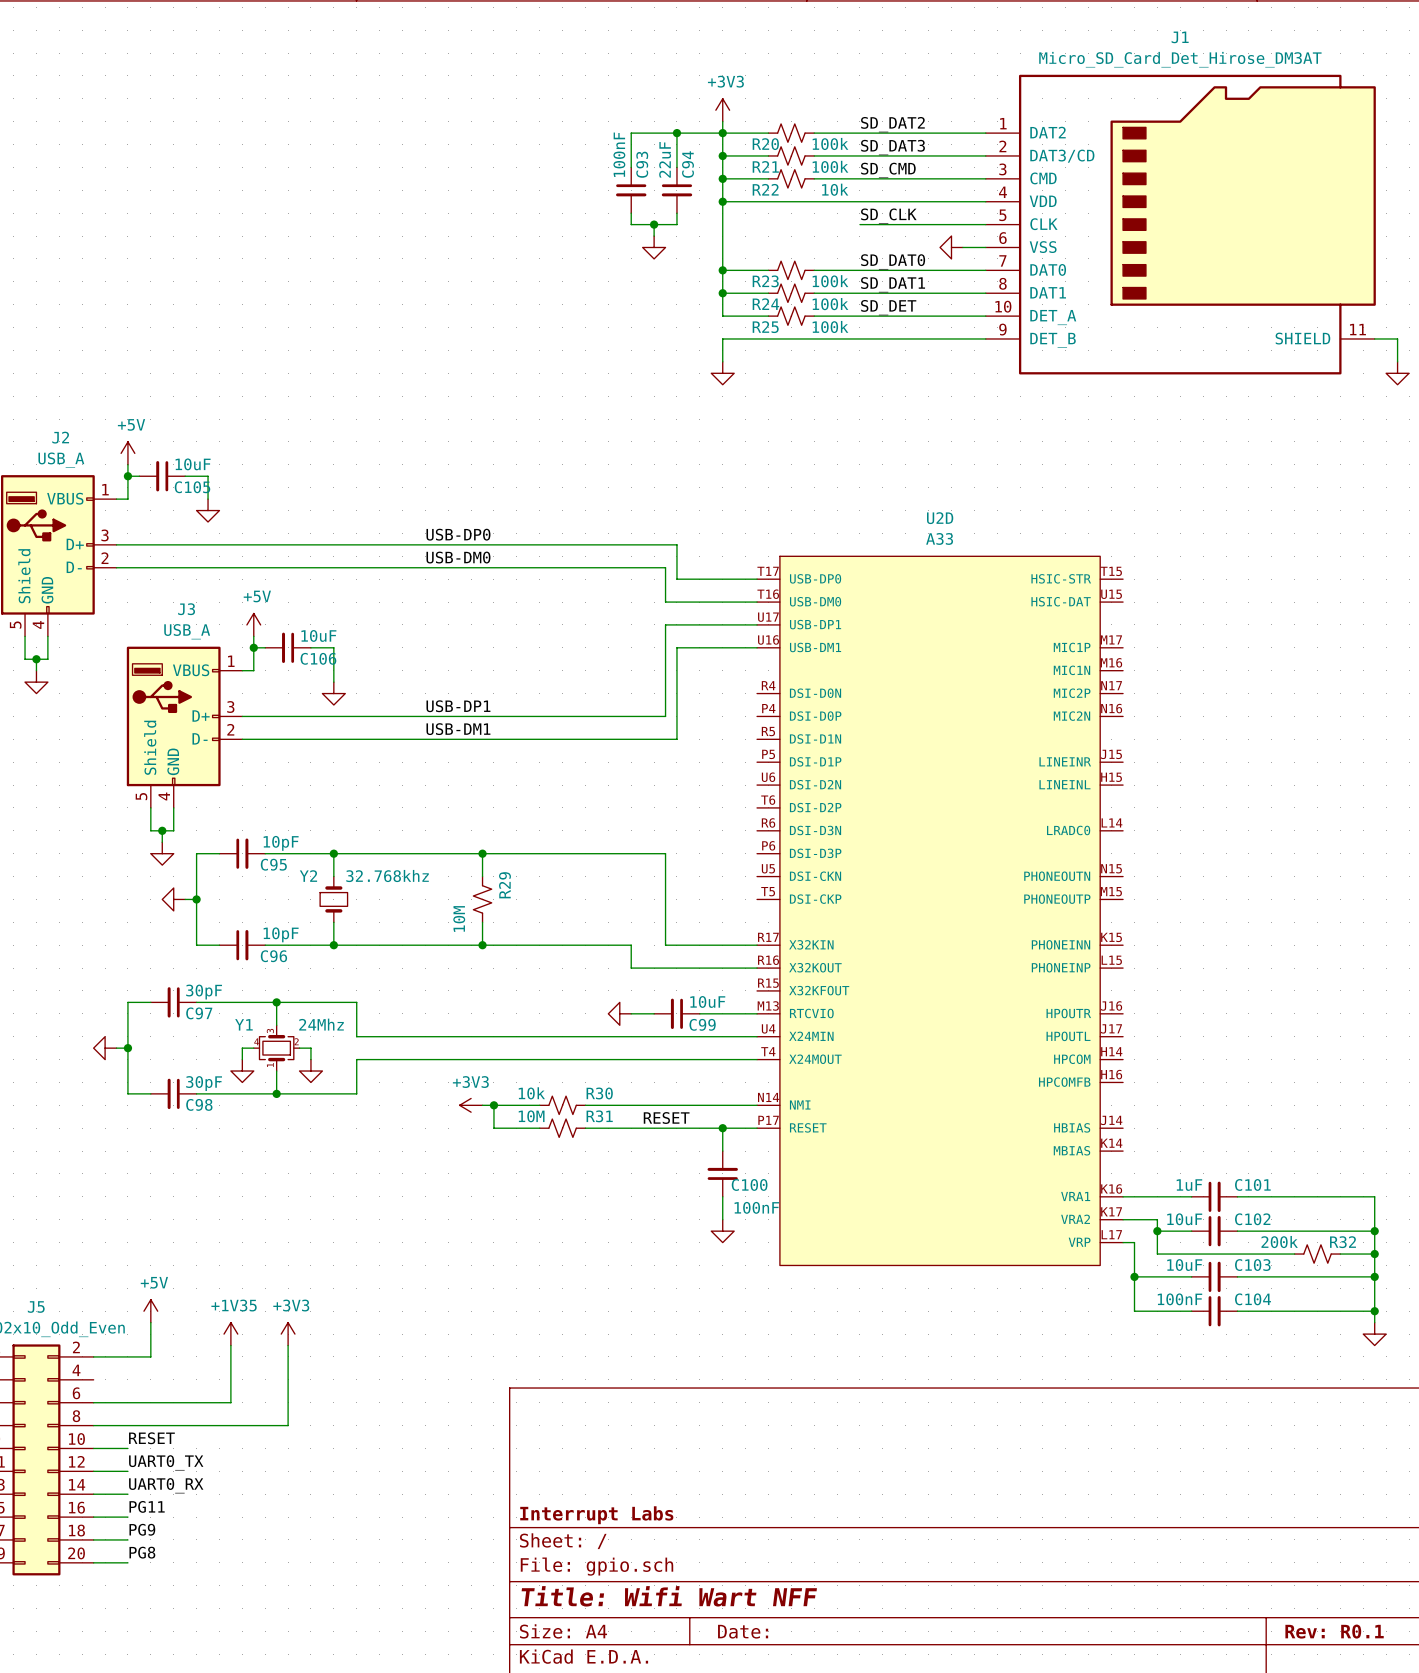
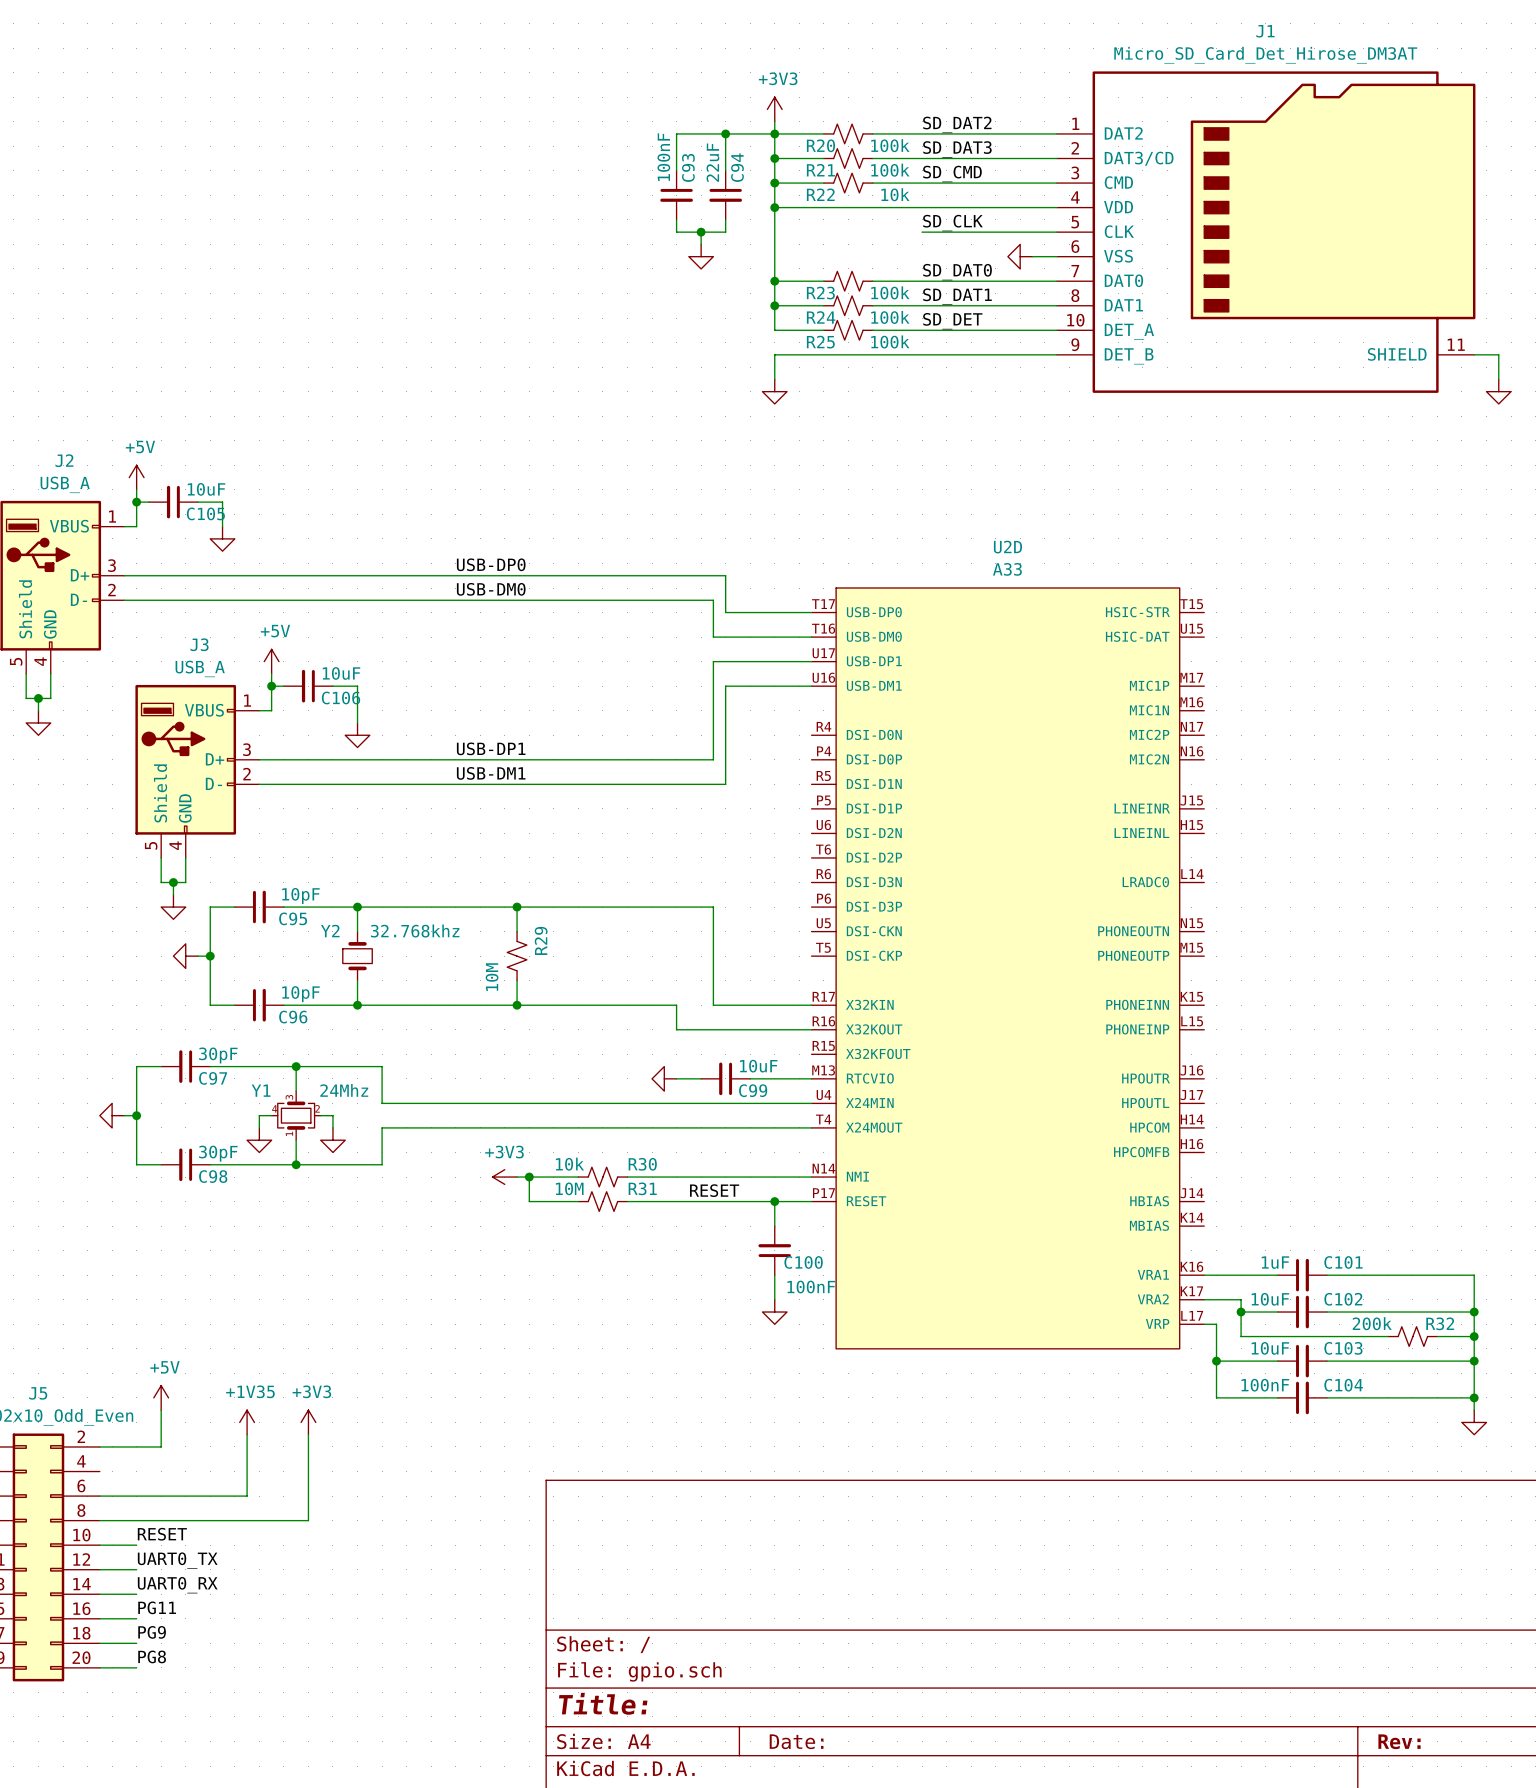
title block: Interrupt Labs (596, 1515) -> none
title block: Title: Wifi Wart NFF (669, 1596) -> Title: (603, 1703)
title block: Rev: R0.1 (1334, 1631) -> Rev: (1399, 1741)

